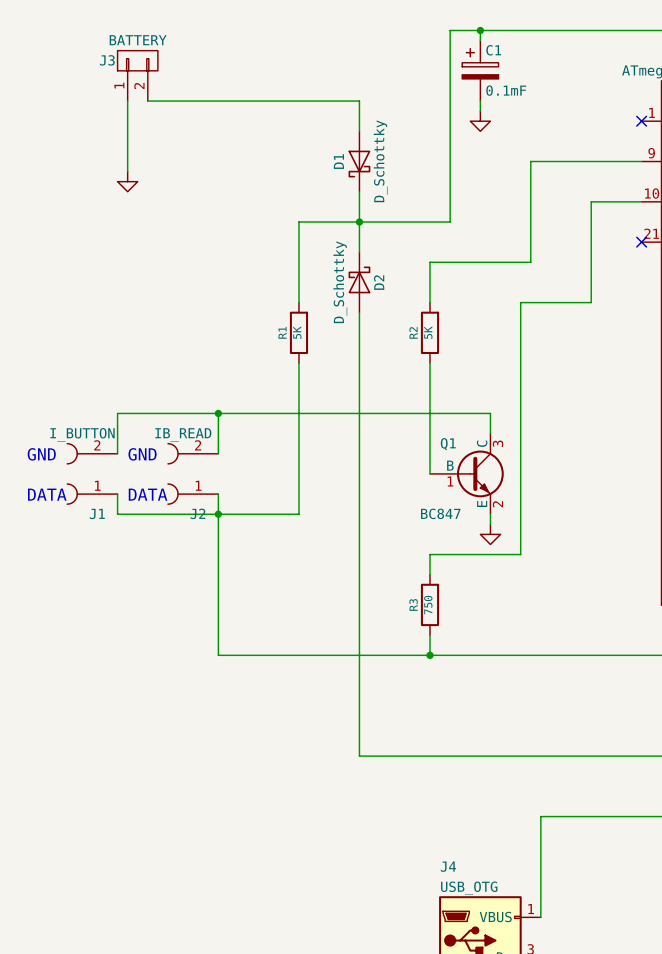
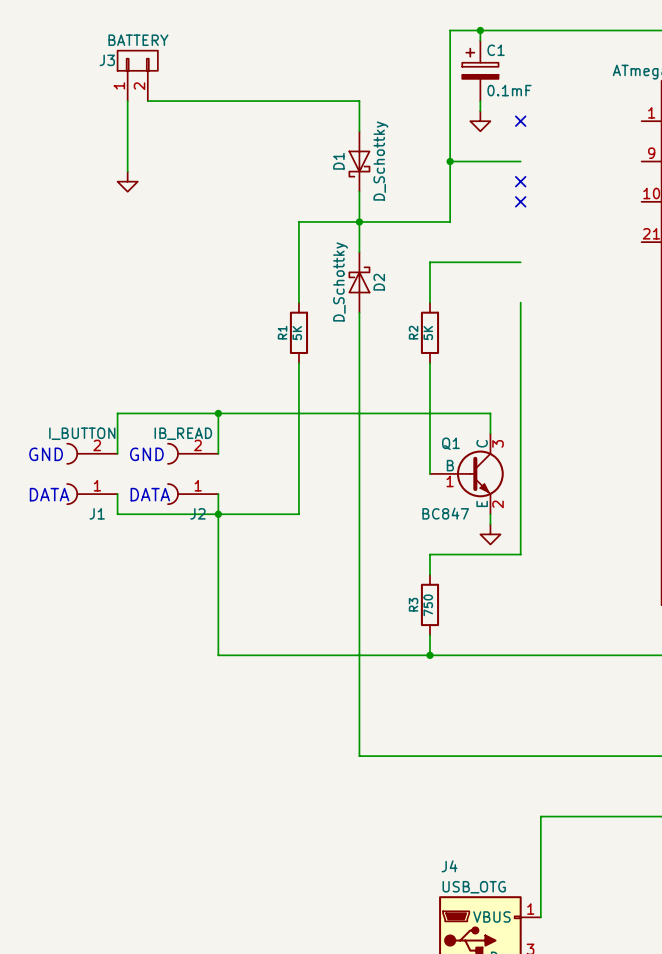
no-connect mark: none -> (520, 121)
no-connect mark: (641, 121) -> none
wire: none -> (450, 161) (520, 161)
junction: none -> (450, 161)
wire: (641, 161) (530, 161) (530, 262) (520, 262) -> none
no-connect mark: none -> (520, 181)
no-connect mark: none -> (520, 201)
wire: (641, 201) (591, 201) (591, 302) (520, 302) -> none
no-connect mark: (641, 242) -> none

